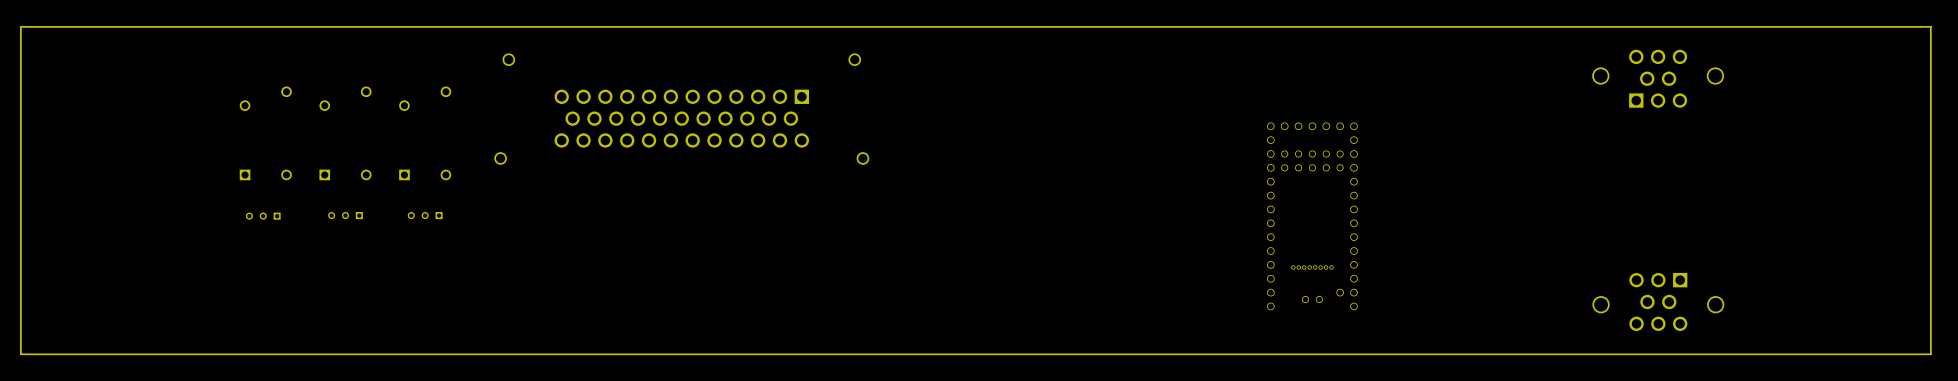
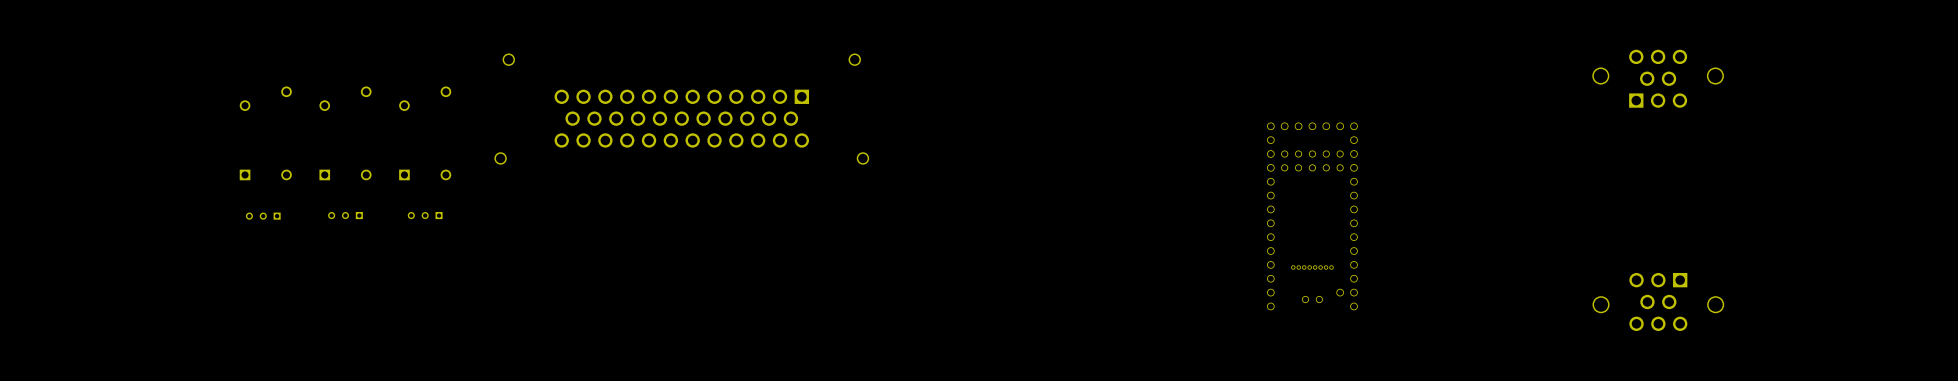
board edge: (1930, 26) (20, 26) (20, 354) (1930, 354) (1930, 26) -> none

